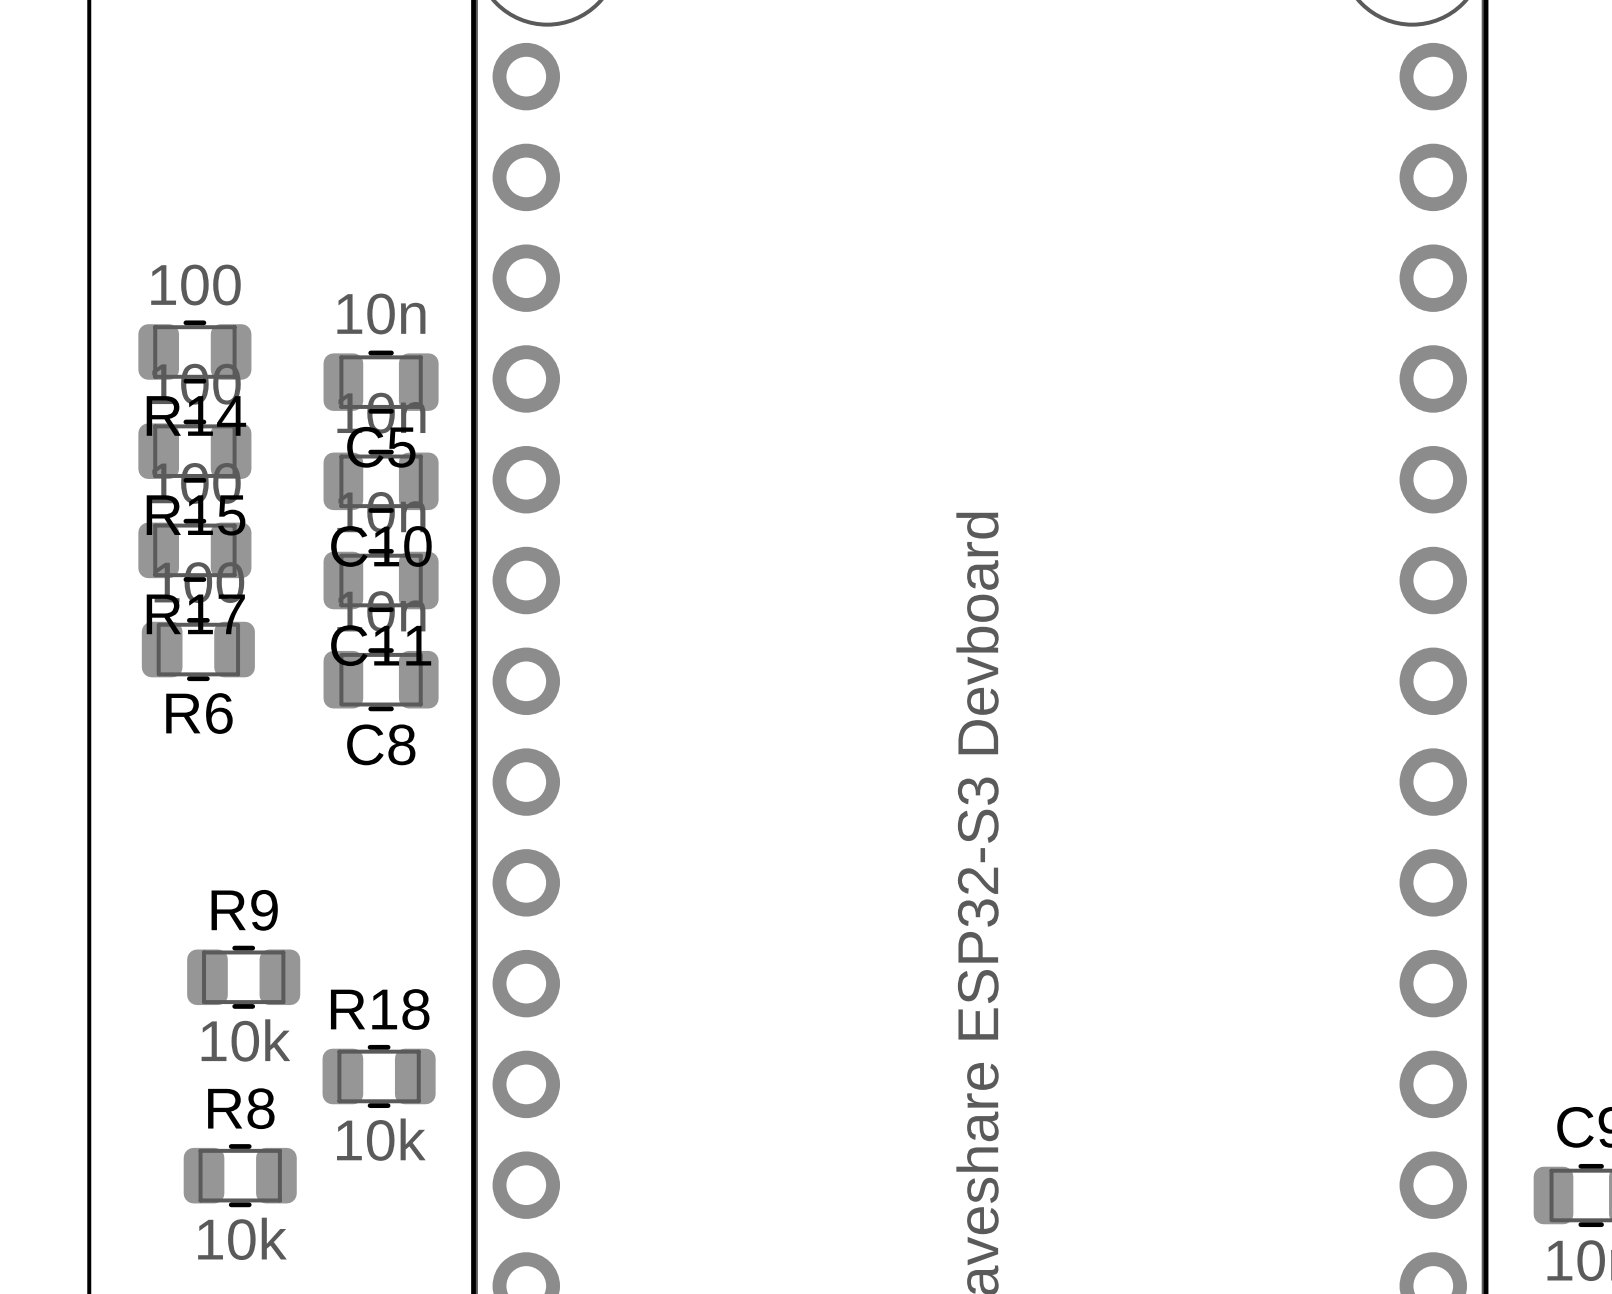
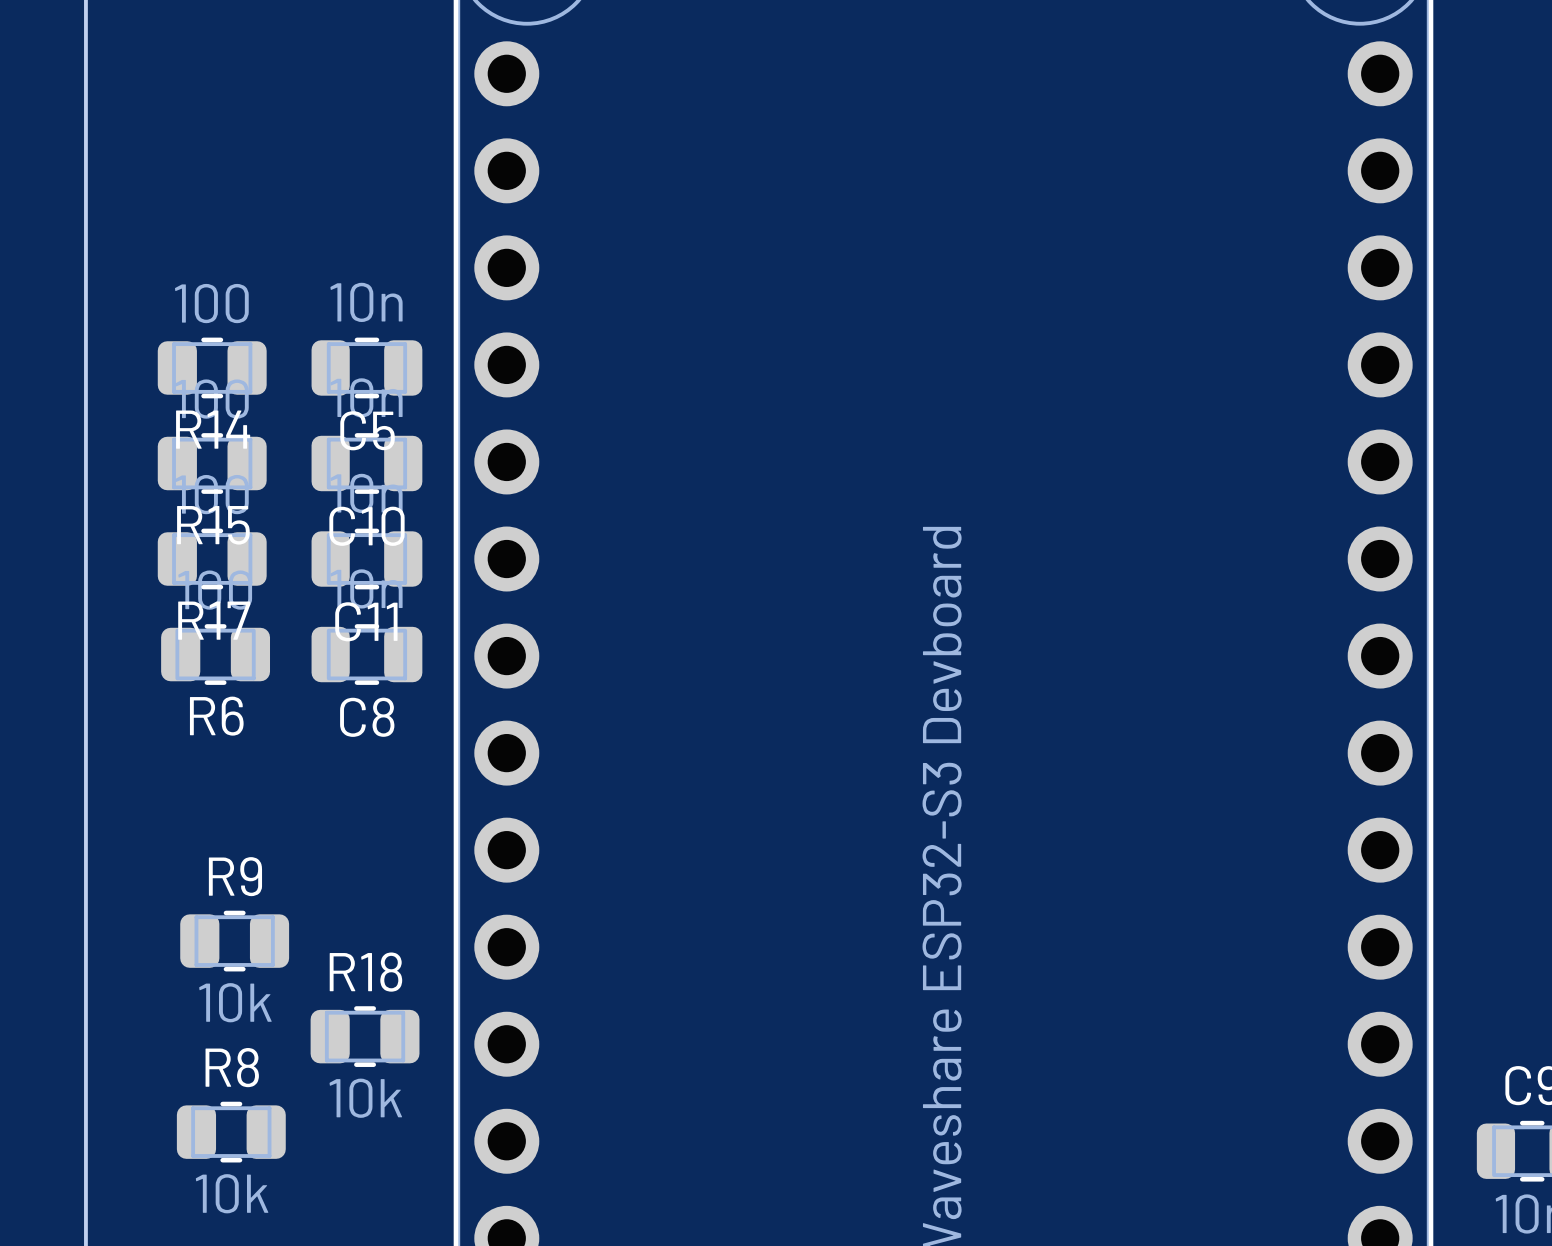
R14 position: (194, 351) -> (212, 367)
R15 position: (194, 451) -> (212, 463)
R17 position: (194, 550) -> (212, 559)
R6 position: (198, 649) -> (215, 654)

